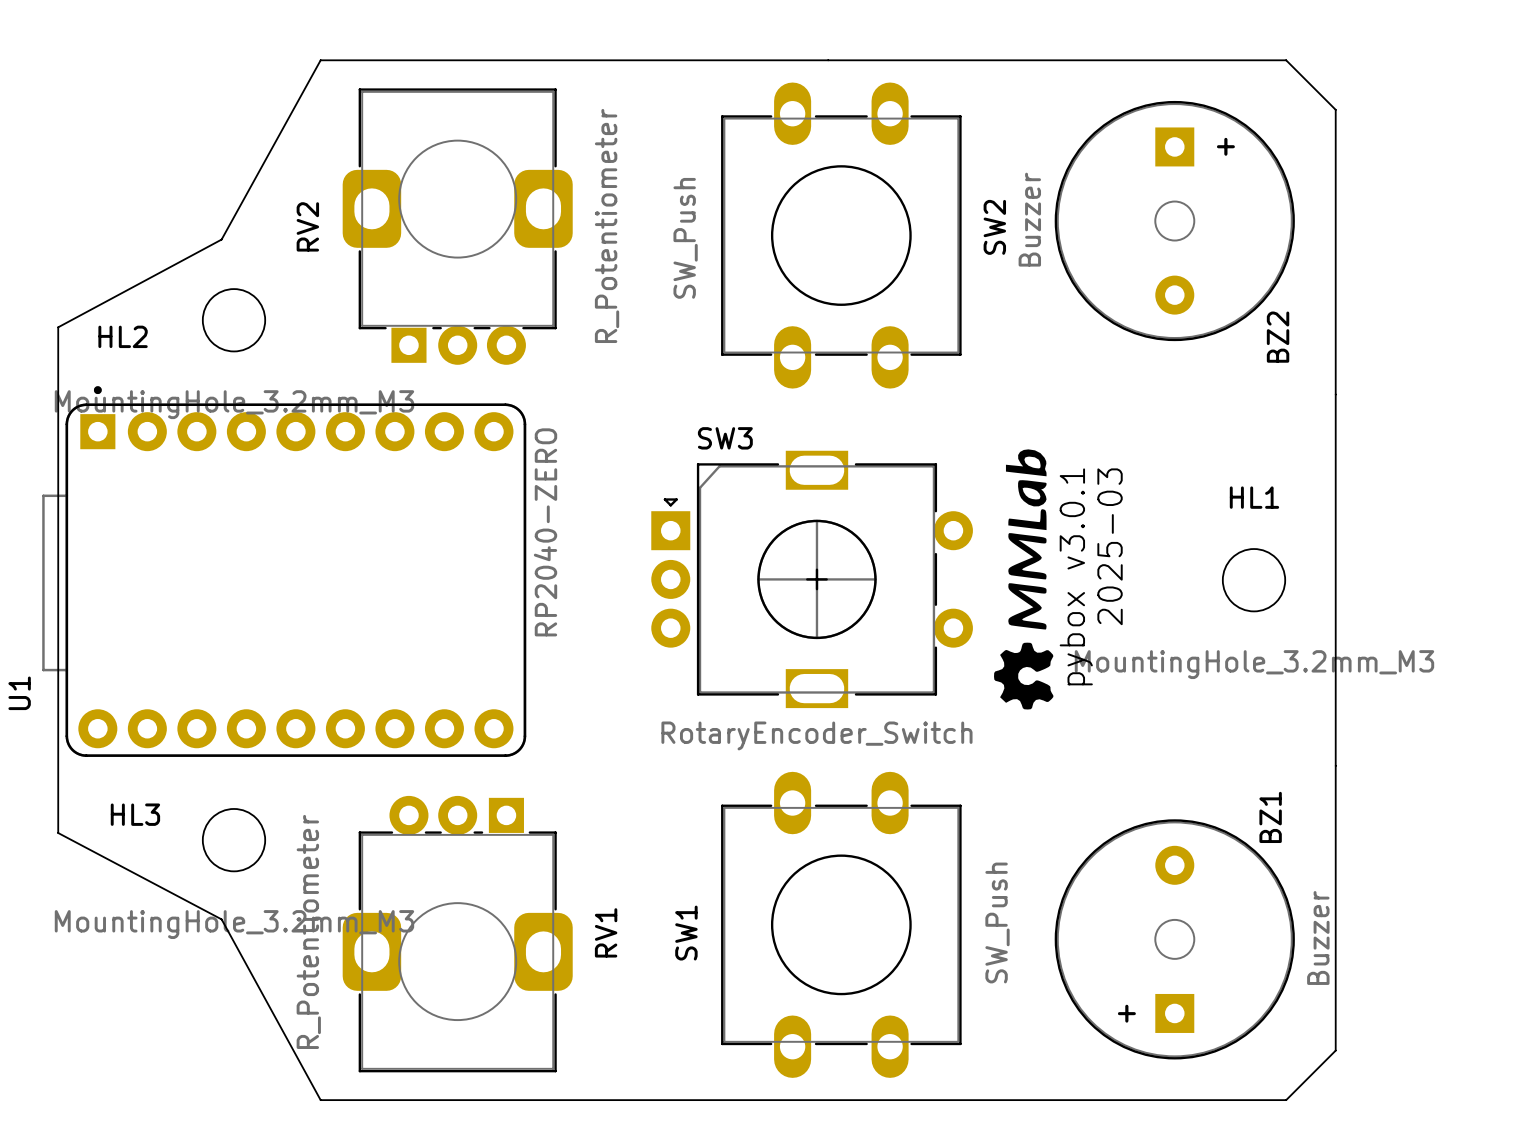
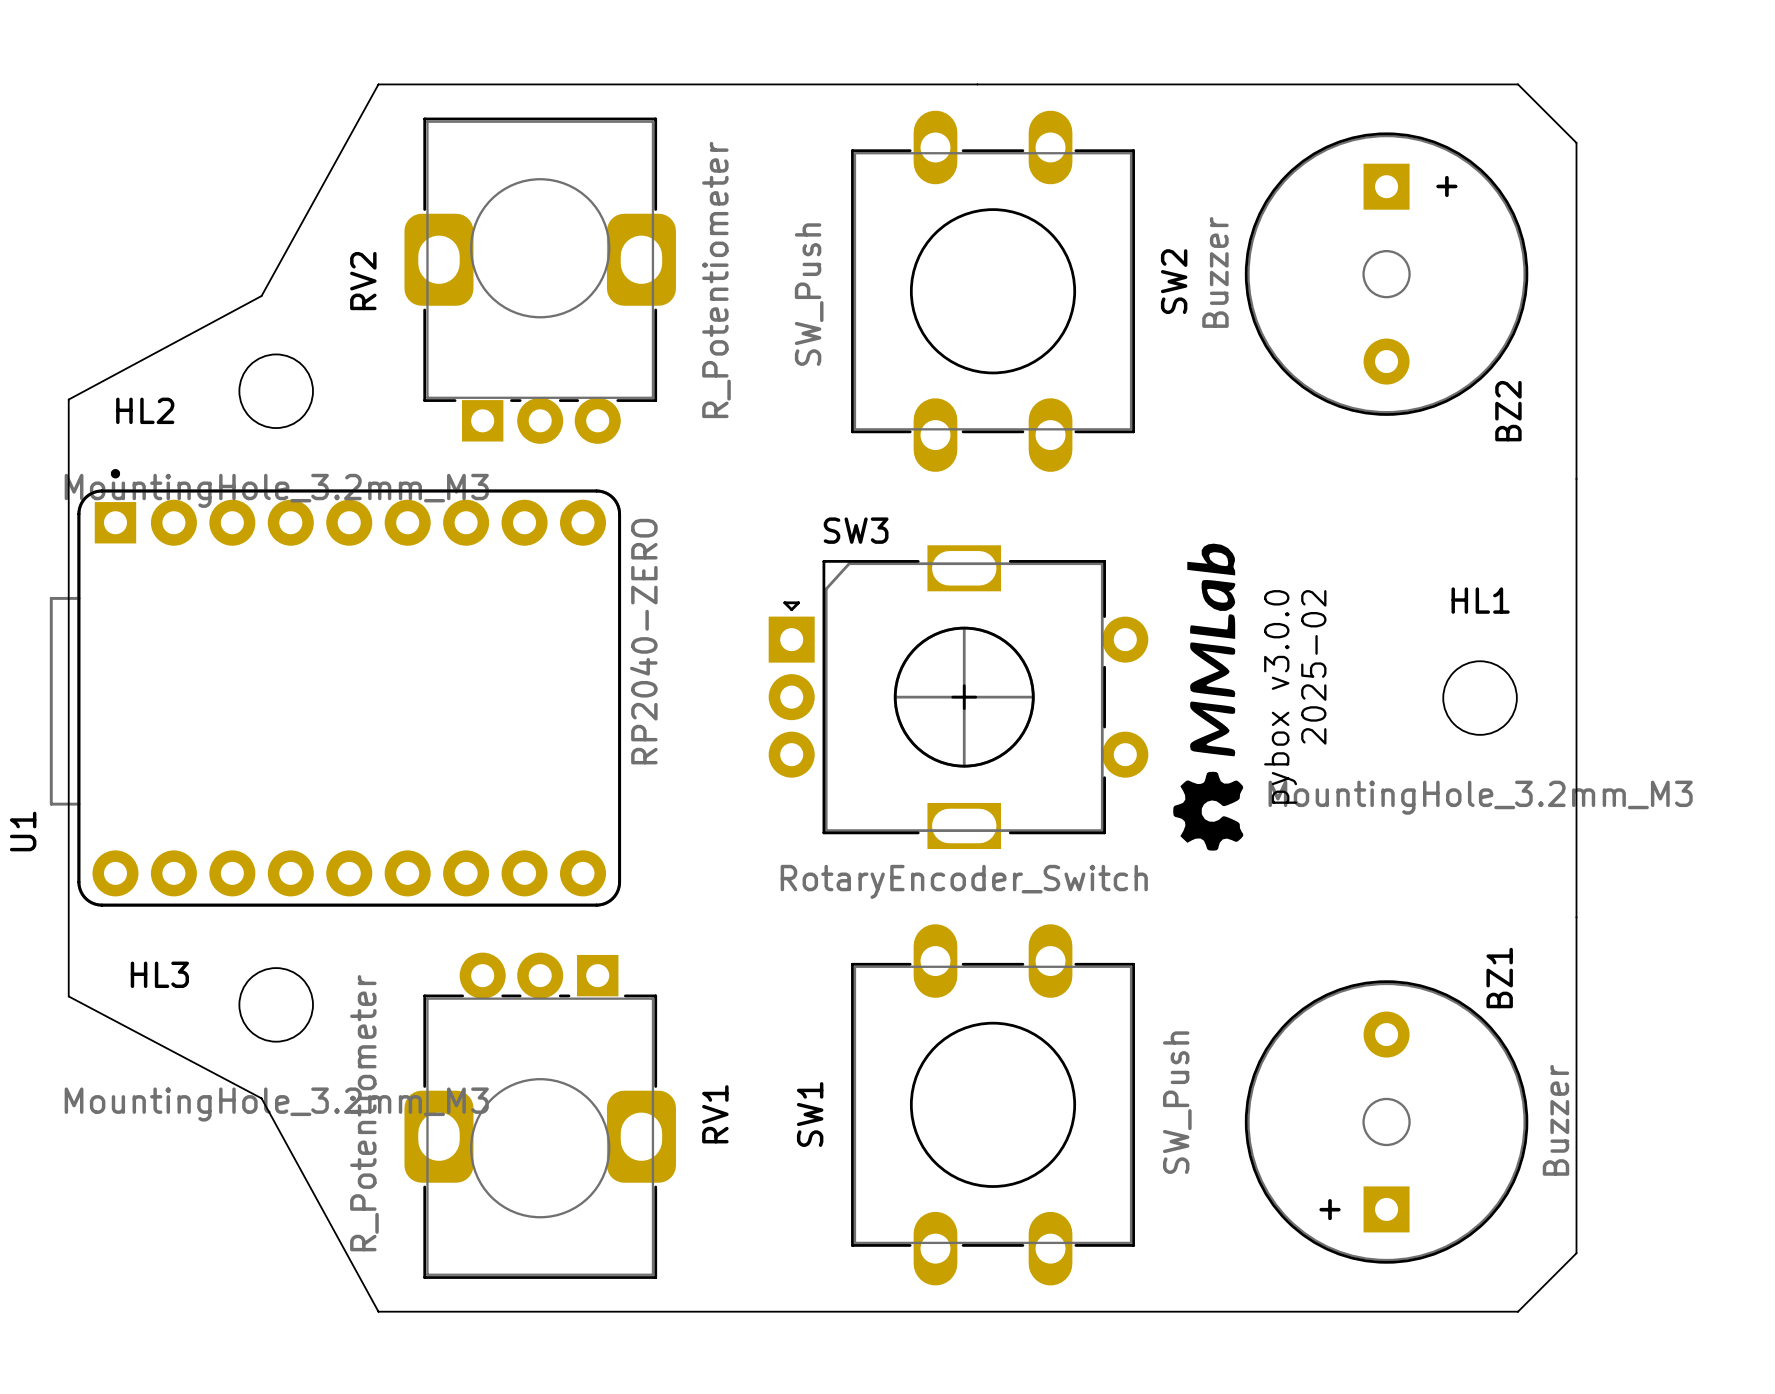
text: 2025-03 (1110, 546) -> 2025-02 (1313, 667)
text: pybox v3.0.1 (1076, 576) -> pybox v3.0.0 (1280, 696)

